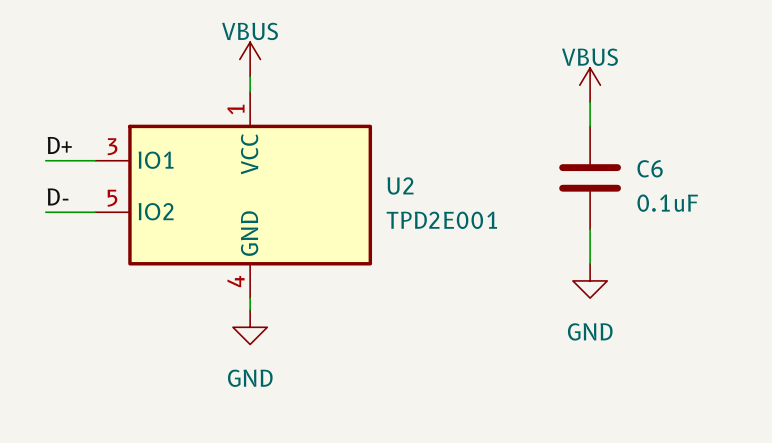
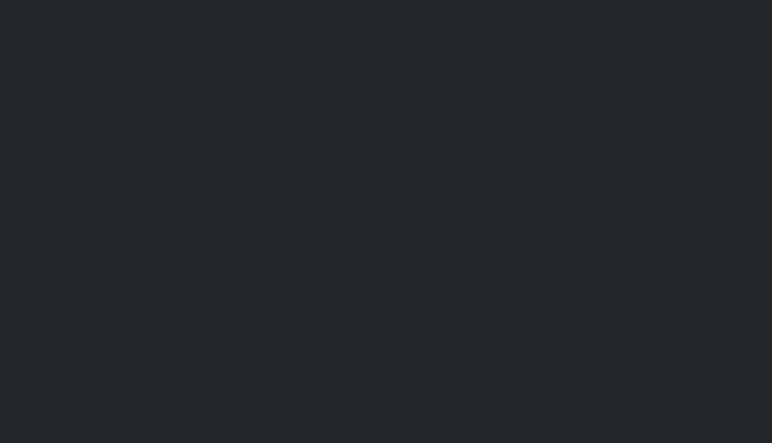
power symbol: VBUS (250, 59) -> none
wire: (250, 76) (250, 92) -> none
power symbol: VBUS (590, 85) -> none
wire: (590, 102) (590, 126) -> none
label: D+ (59, 145) -> none
wire: (45, 160) (95, 160) -> none
C6: 0.1uF (590, 177) -> none
U2: TPD2E001 (233, 195) -> none
label: D- (58, 196) -> none
wire: (45, 212) (95, 212) -> none
wire: (590, 229) (590, 263) -> none
power symbol: GND (590, 280) -> none
wire: (250, 298) (250, 310) -> none
power symbol: GND (250, 327) -> none

